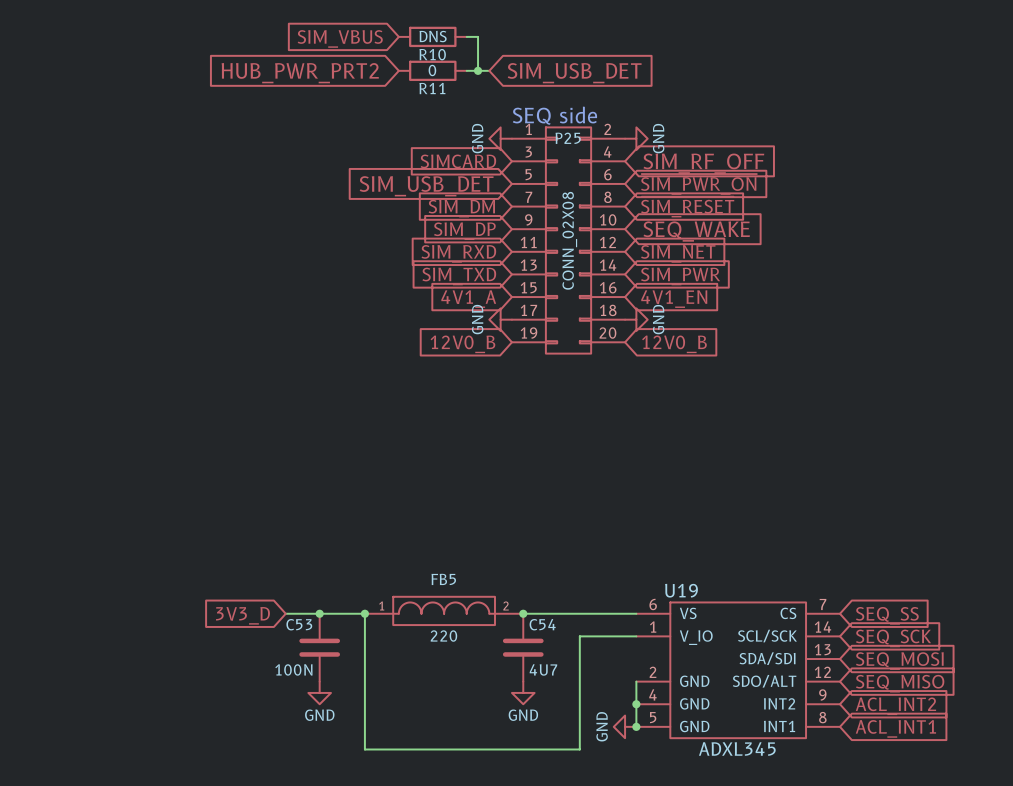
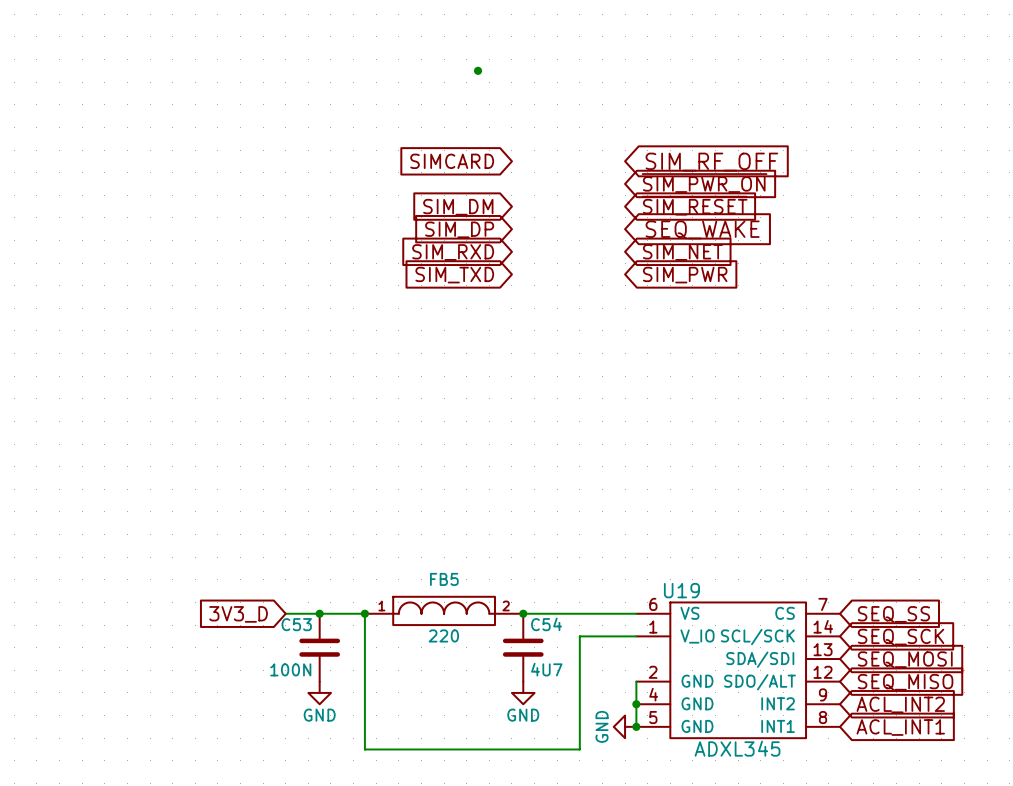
R10: DNS (432, 36) -> none
wire: (466, 36) (478, 36) (478, 70) -> none
global label: SIM_VBUS (340, 38) -> none
R11: 0 (432, 70) -> none
wire: (466, 70) (489, 70) -> none
global label: HUB_PWR_PRT2 (300, 73) -> none
global label: SIM_USB_DET (574, 73) -> none
text: SEQ side (554, 115) -> none
power symbol: GND (500, 138) -> none
power symbol: GND (636, 138) -> none
global label: SIM_USB_DET (426, 186) -> none
P25: CONN_02X08 (568, 240) -> none
global label: 4V1_A (468, 299) -> none
global label: 4V1_EN (674, 299) -> none
power symbol: GND (500, 319) -> none
power symbol: GND (636, 319) -> none
global label: 12V0_B (462, 344) -> none
global label: 12V0_B (674, 344) -> none

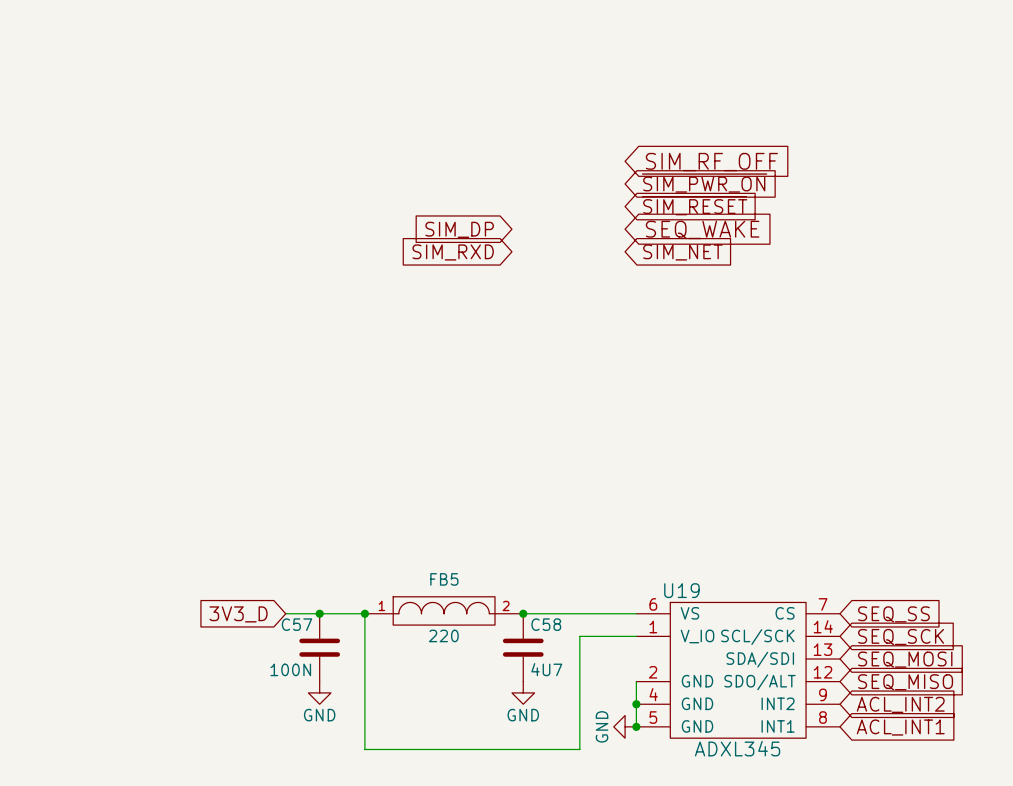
junction: (478, 70) -> none
global label: SIMCARD (452, 161) -> none
global label: SIM_DM (458, 207) -> none
global label: SIM_TXD (454, 275) -> none
global label: SIM_PWR (685, 275) -> none
C53 name: C53 (296, 624) -> C57 (296, 624)
C54 name: C54 (546, 624) -> C58 (546, 624)

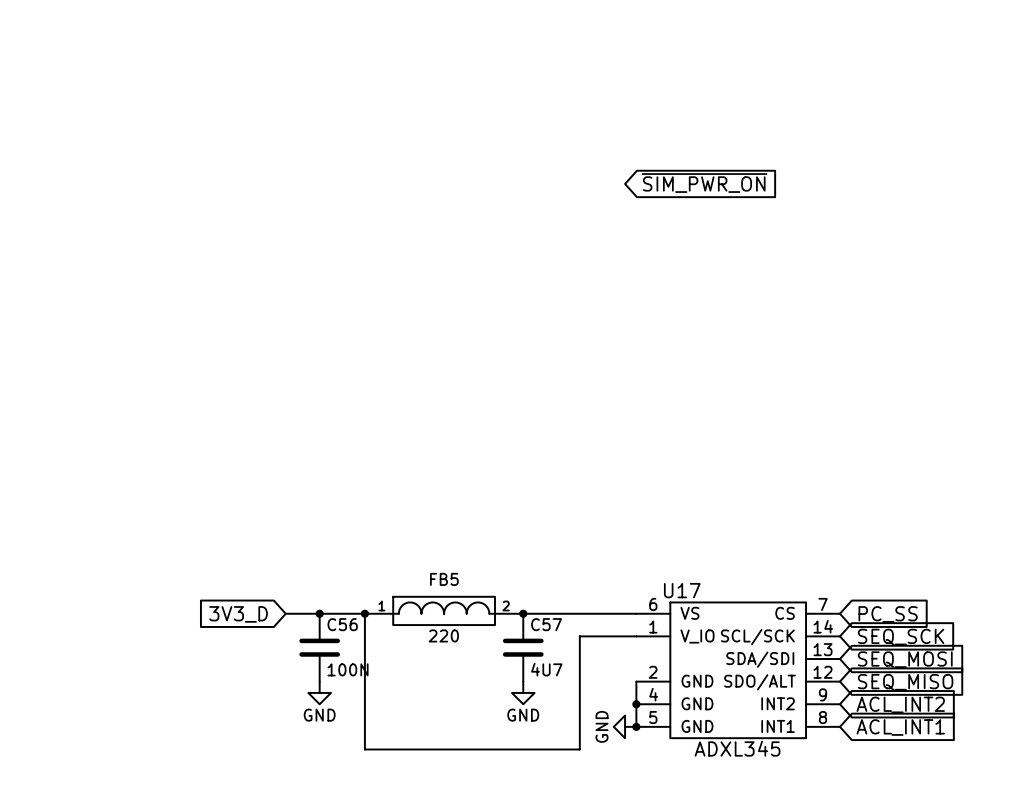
global label: SIM_RF_OFF (711, 162) -> none
global label: ~{SIM_RESET} (694, 205) -> none
global label: SIM_DP (459, 229) -> none
global label: SEQ_WAKE (702, 229) -> none
global label: SIM_RXD (453, 252) -> none
global label: SIM_NET (682, 252) -> none
U19 name: U19 (681, 590) -> U17 (682, 590)
global label: SEQ_SS (893, 614) -> PC_SS (888, 614)
C57 name: C57 (296, 624) -> C56 (342, 624)
C58 name: C58 (546, 624) -> C57 (546, 624)
C57 value position: 100N (290, 669) -> 100N (348, 669)

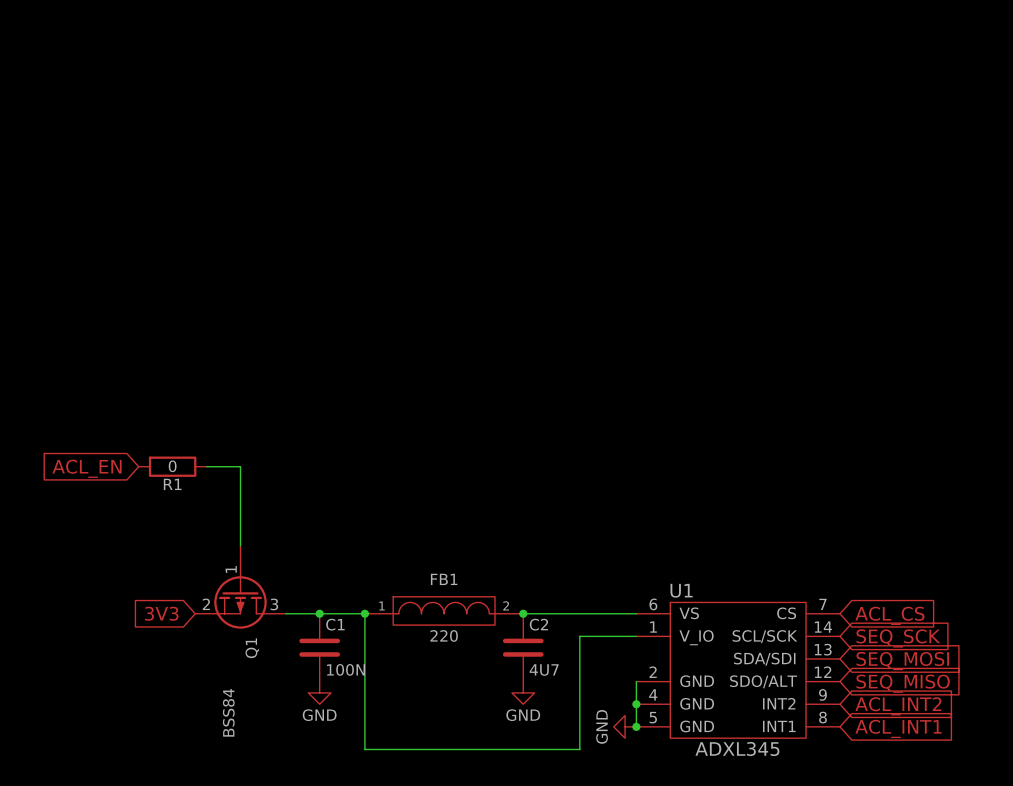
global label: ~{SIM_PWR_ON} (704, 183) -> none
R1: none -> 0 (172, 466)
wire: none -> (206, 466) (240, 466) (240, 545)
global label: none -> ACL_EN (87, 468)
FB5 name: FB5 (444, 579) -> FB1 (444, 579)
Q1: none -> BSS84 (240, 587)
U17 name: U17 (682, 590) -> U1 (681, 590)
global label: 3V3_D (238, 614) -> 3V3 (161, 613)
global label: PC_SS (888, 614) -> ACL_CS (889, 615)
C56 name: C56 (342, 624) -> C1 (335, 624)
C57 name: C57 (546, 624) -> C2 (538, 624)

